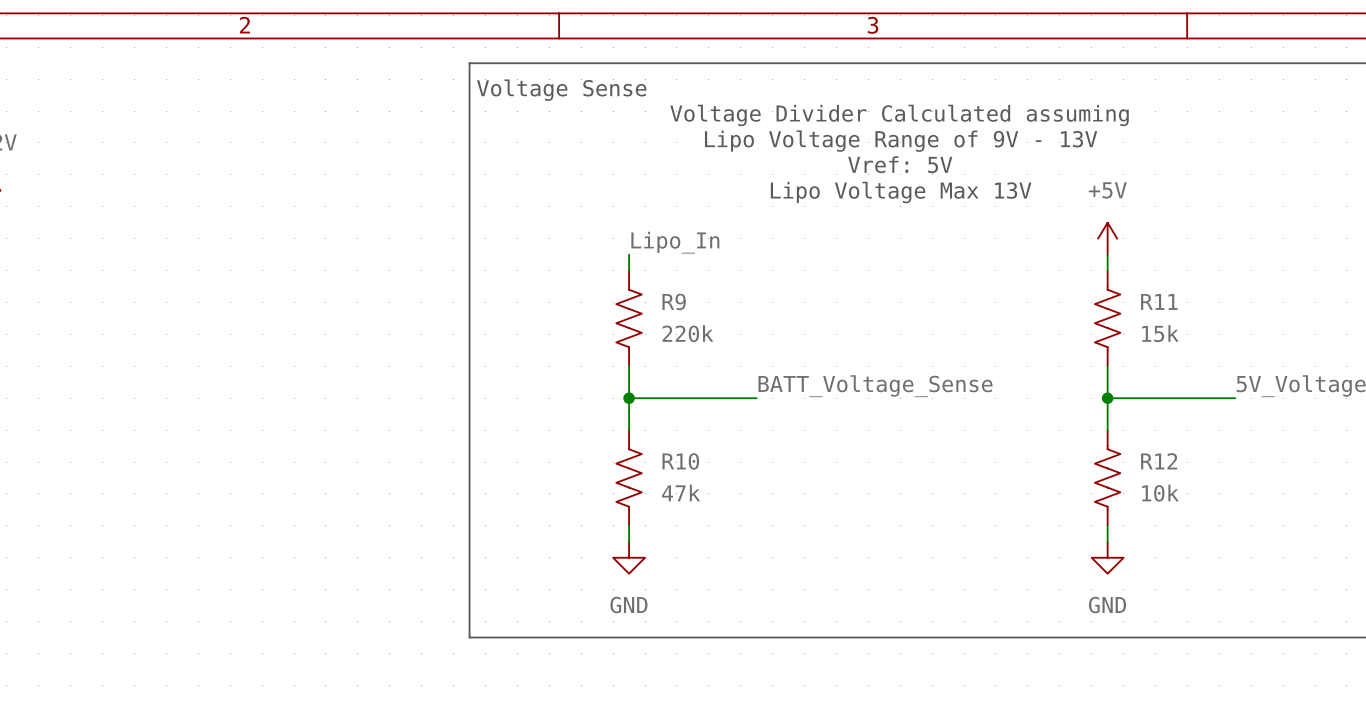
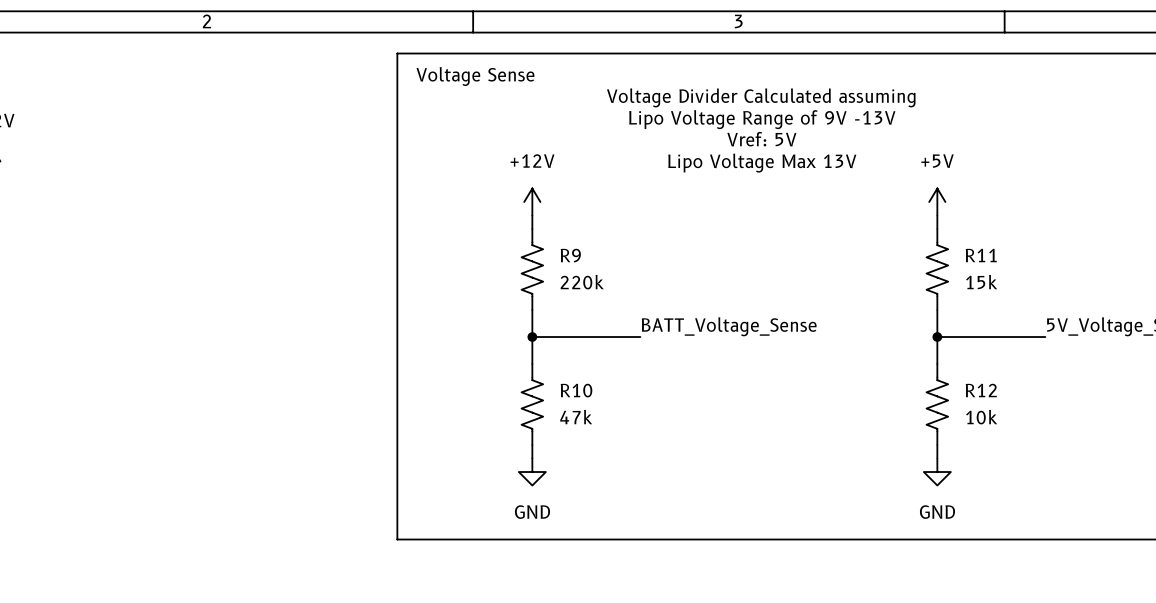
text: Lipo Voltage Range of 9V - 13V (901, 141) -> Lipo Voltage Range of 9V -13V (762, 119)
power symbol: none -> +12V (532, 202)
label: Lipo_In (675, 242) -> none

